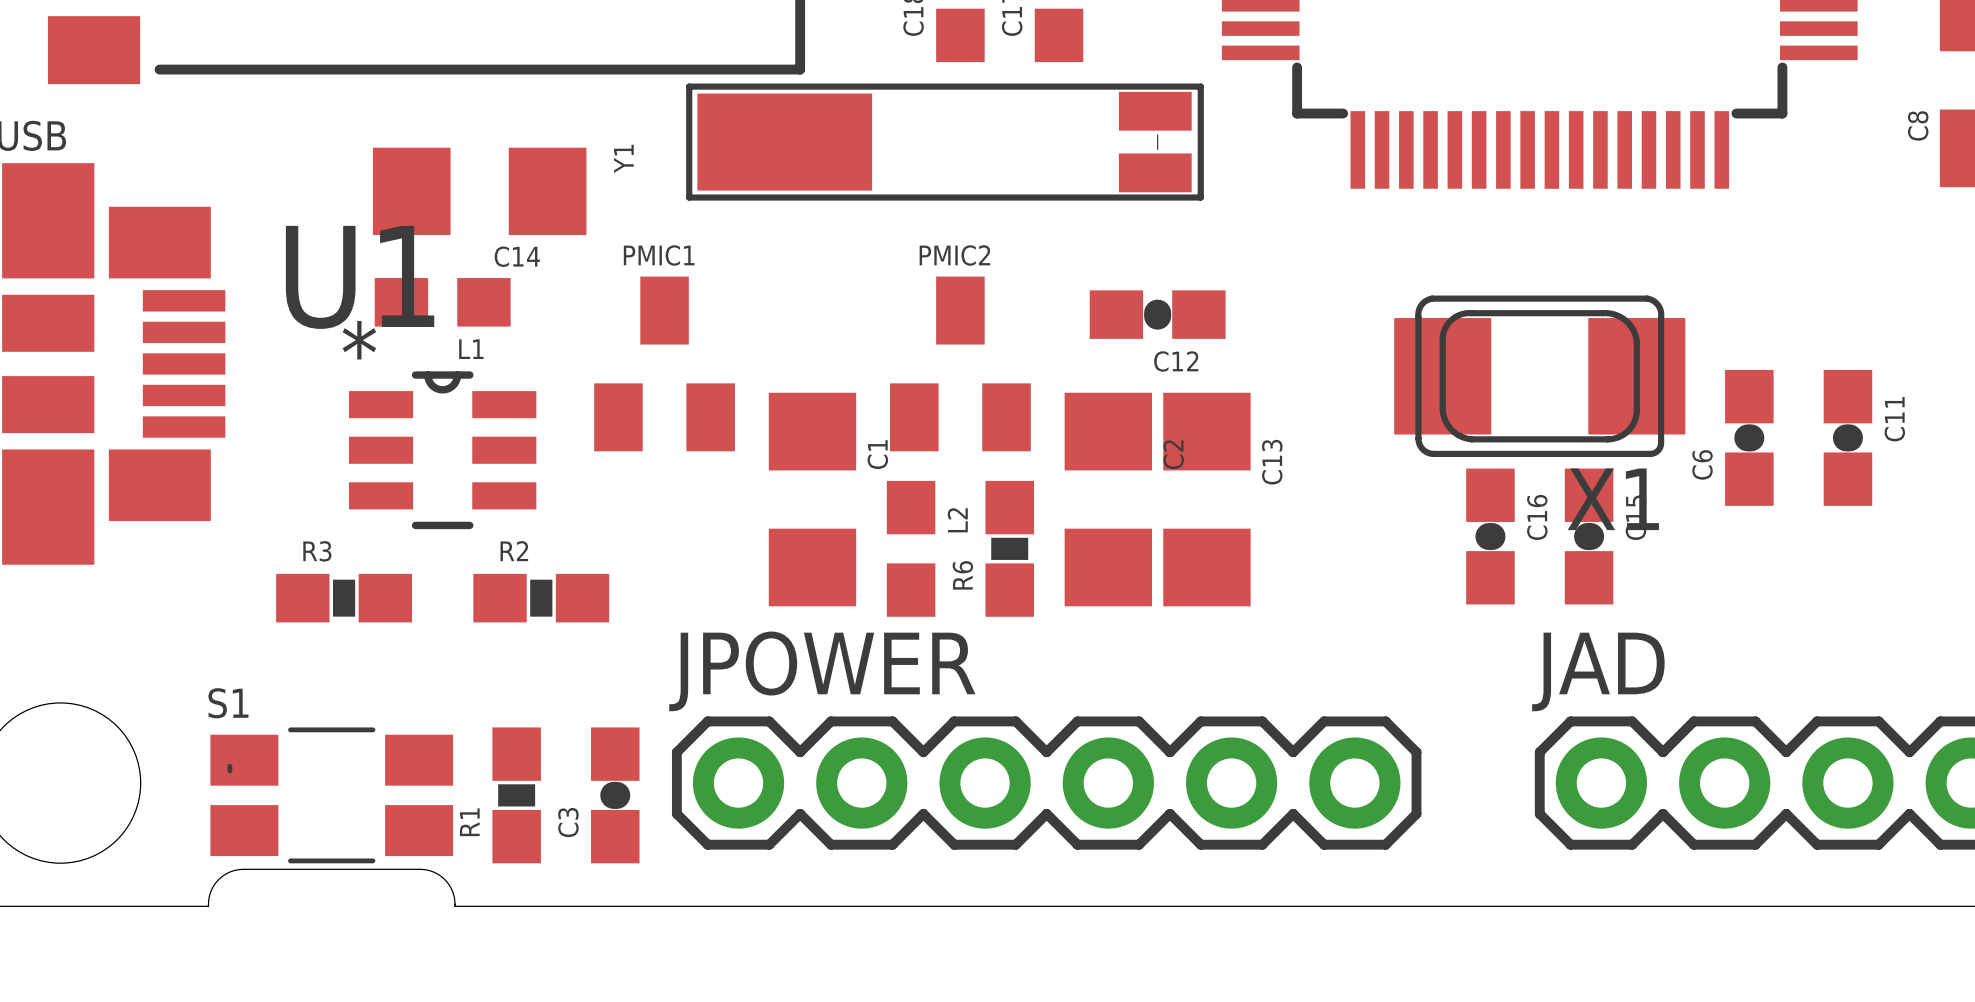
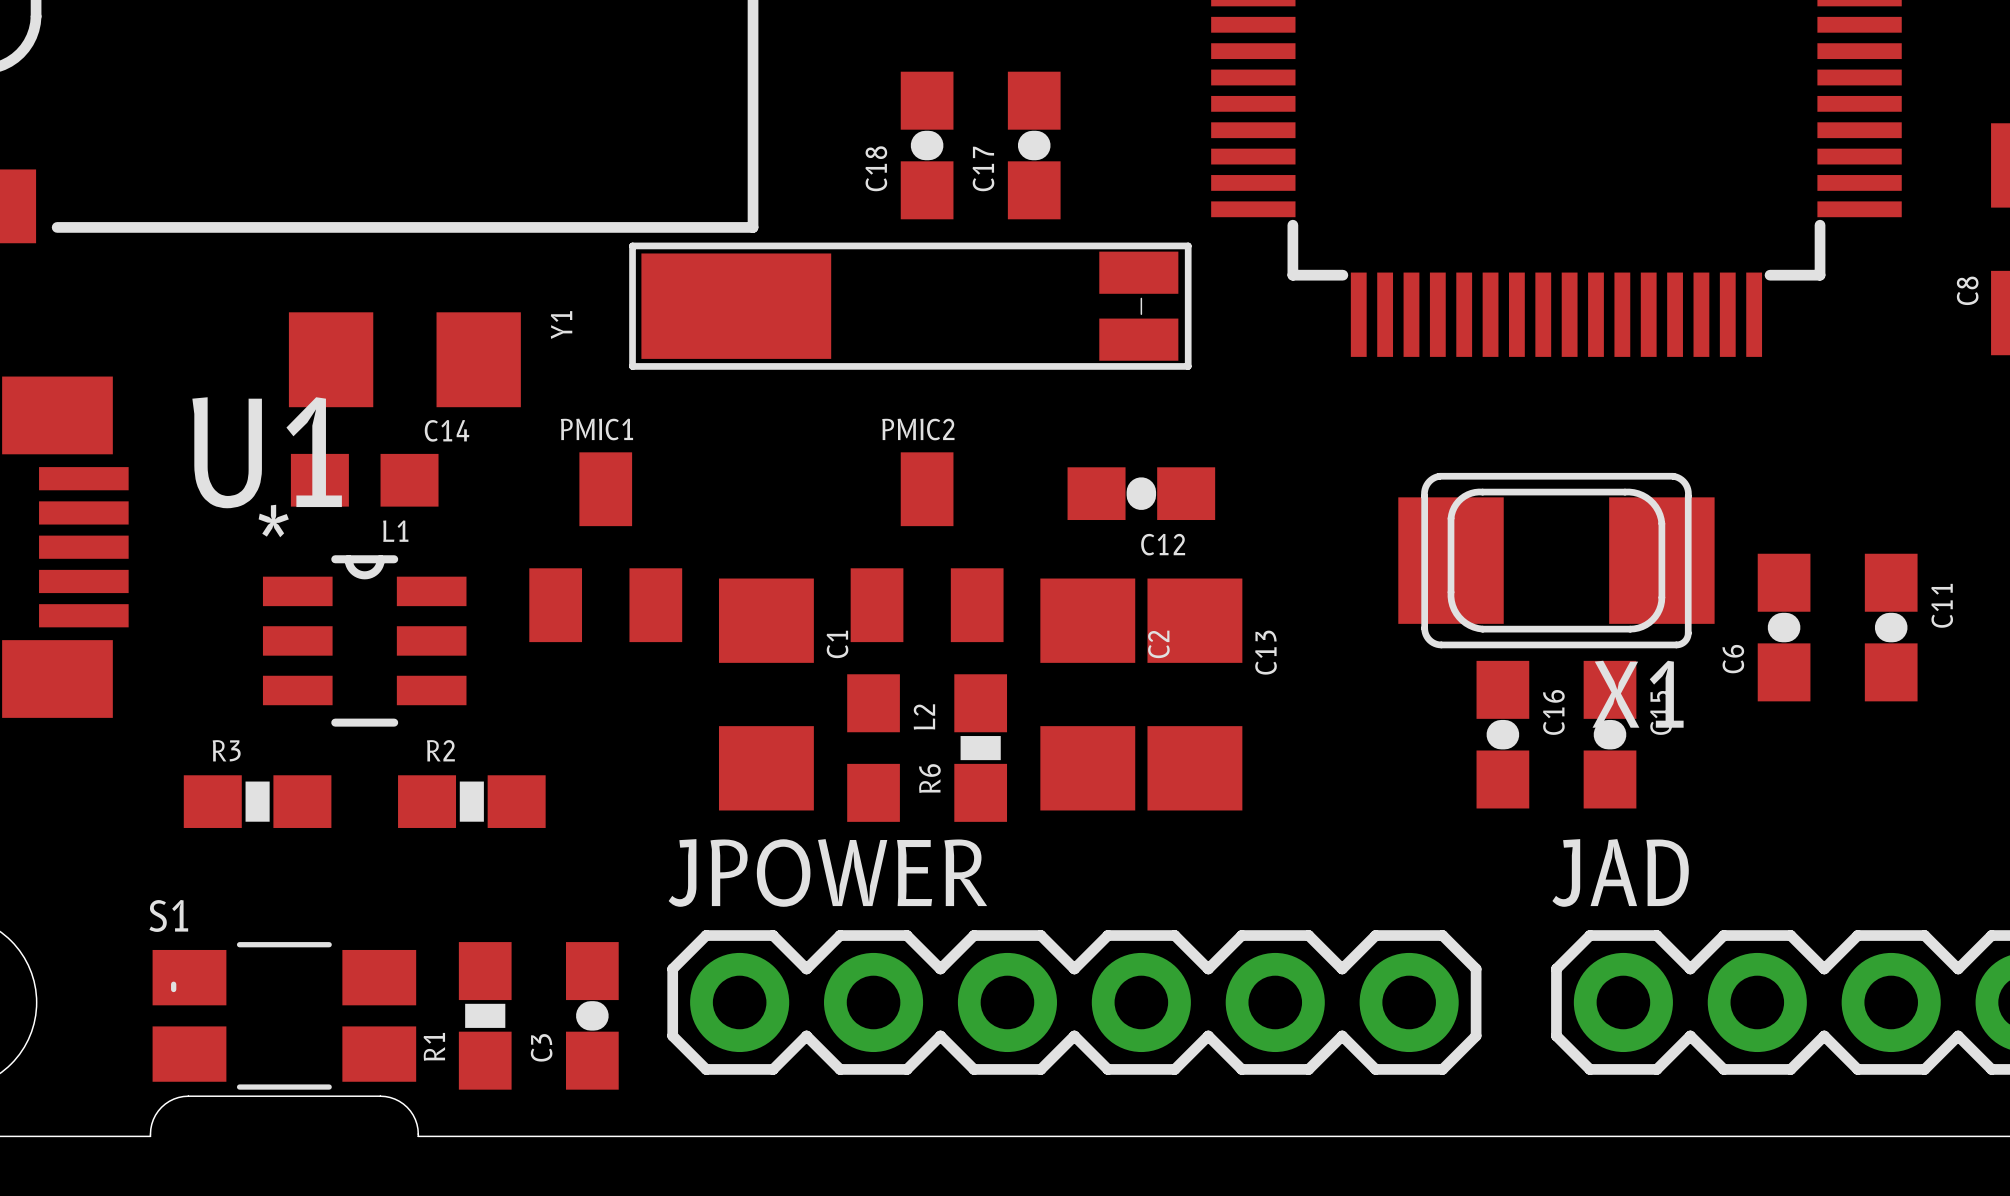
JPOWER position: (1046, 783) -> (1074, 1002)
S1 position: (331, 795) -> (284, 1015)
R1 position: (516, 795) -> (485, 1015)
C3 position: (615, 795) -> (592, 1015)
board edge: (280, 869) (238, 869) (225, 874) (213, 886) (208, 906) -> (188, 1096) (173, 1099) (161, 1107) (153, 1119) (150, 1136) (110, 1136)
board edge: (420, 869) (433, 872) (444, 879) (452, 890) (455, 906) (491, 906) -> (340, 1096) (385, 1096) (399, 1101) (413, 1115) (416, 1124) (418, 1136)

